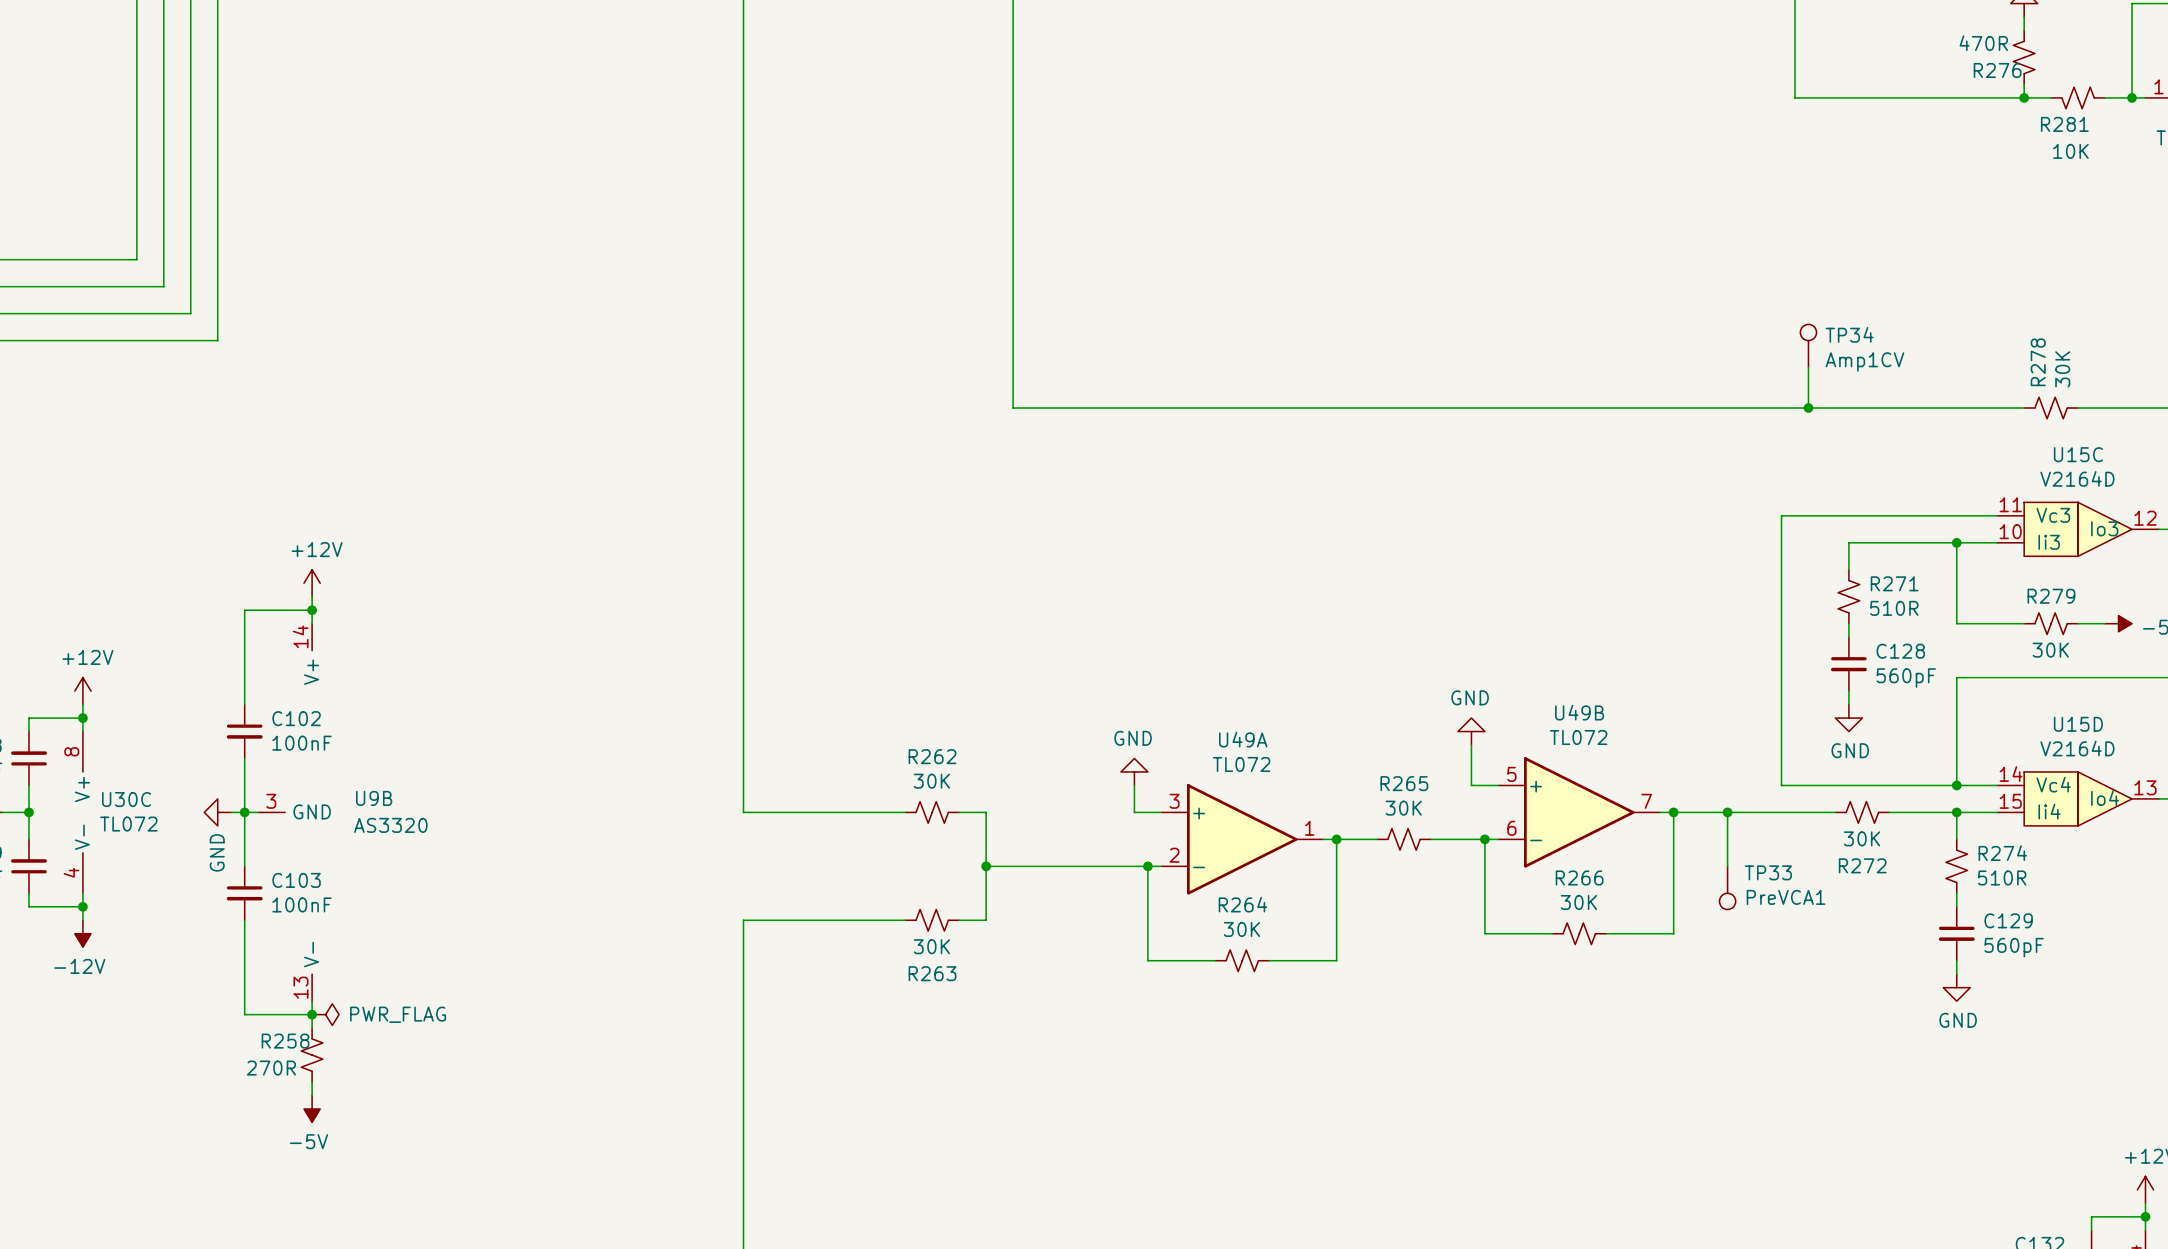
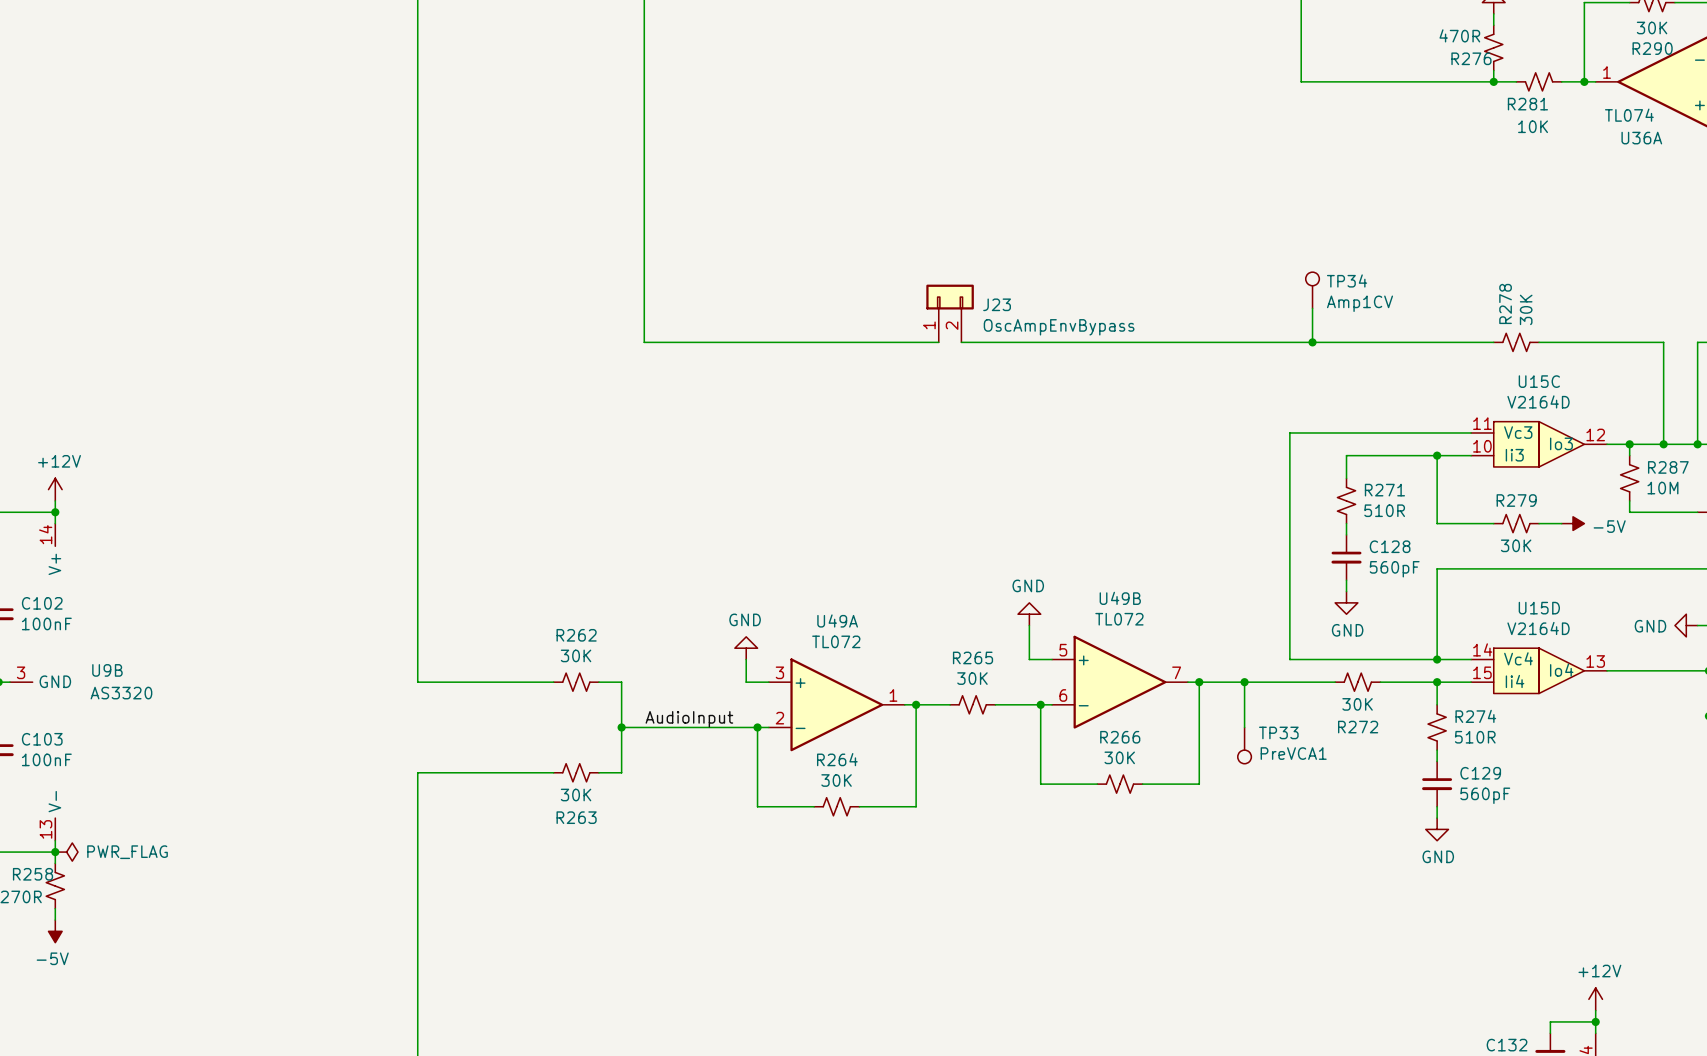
J23: none -> OscAmpEnvBypass (950, 313)
wire: (1363, 408) (1390, 408) -> none
label: none -> AudioInput (689, 719)

